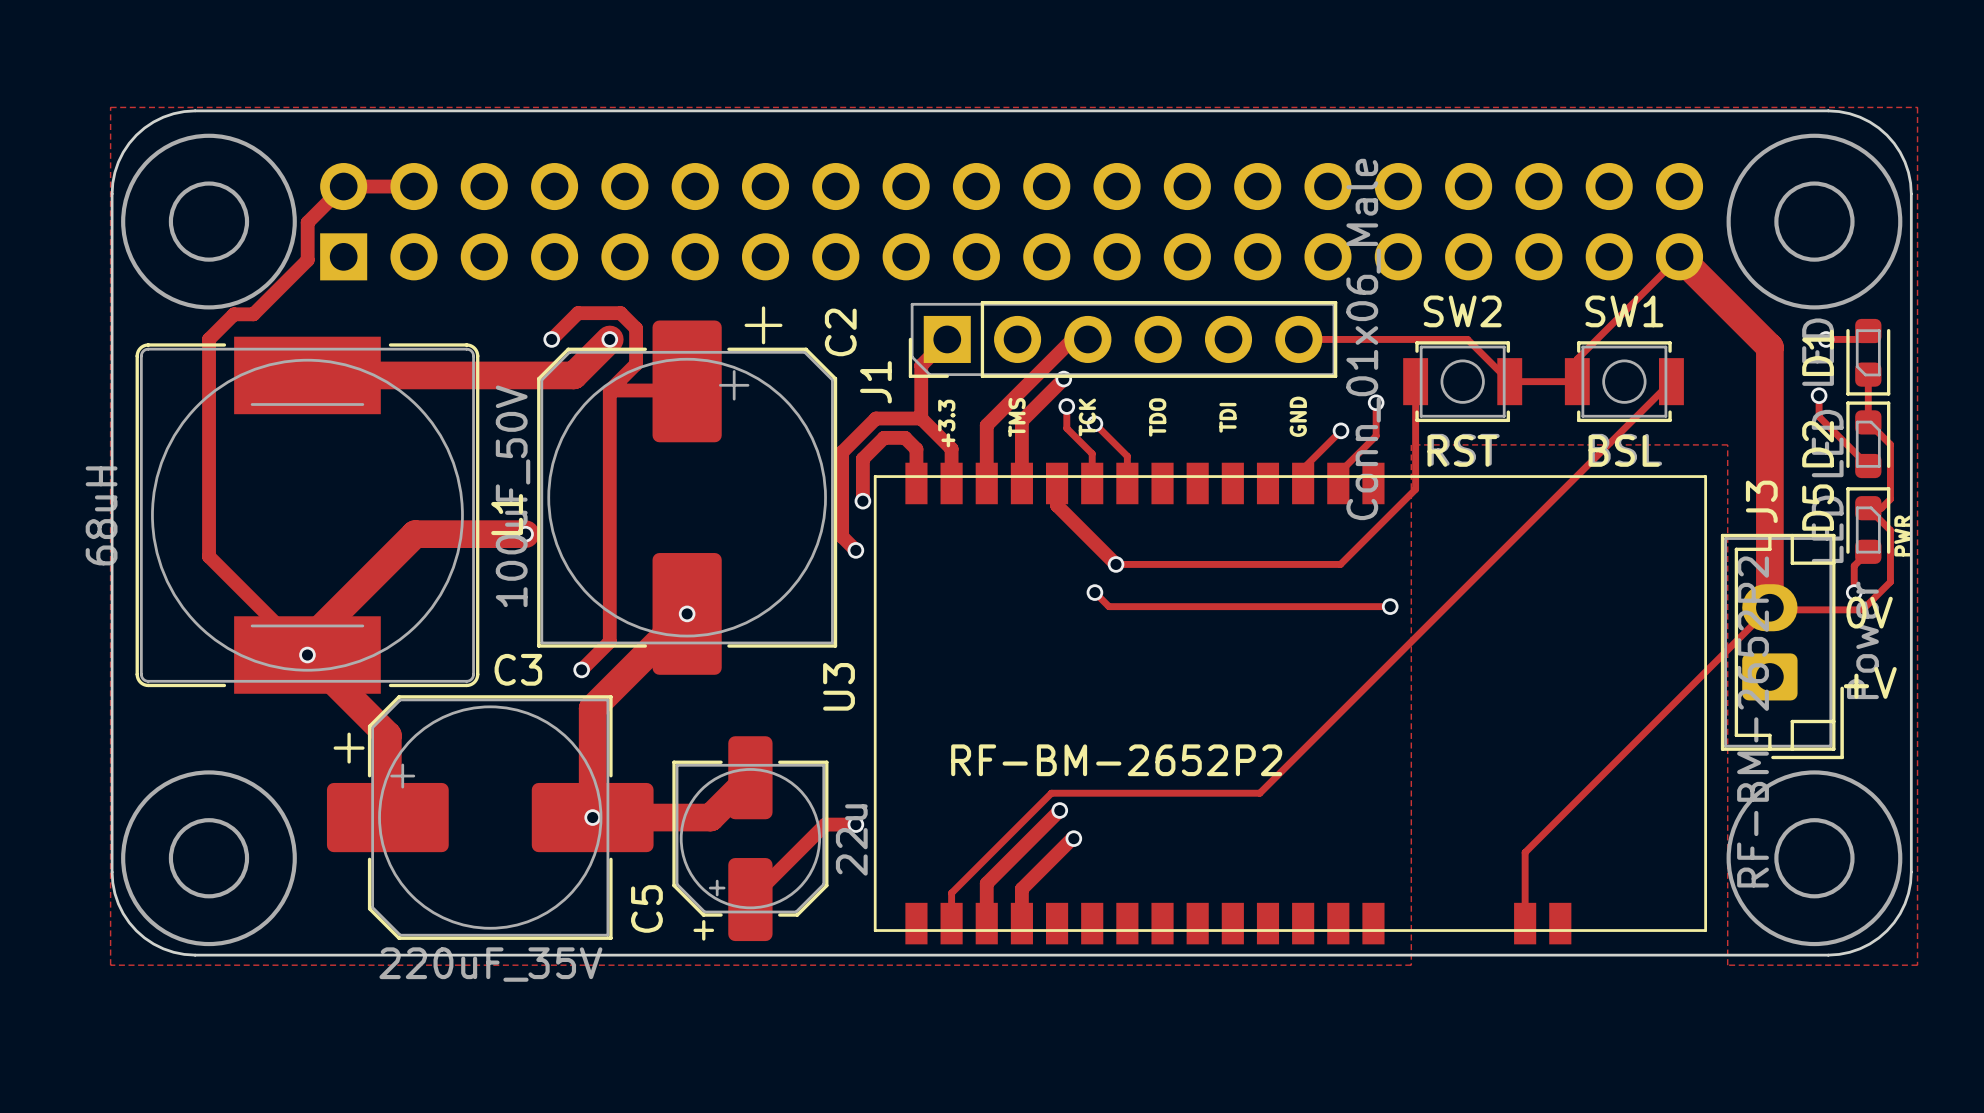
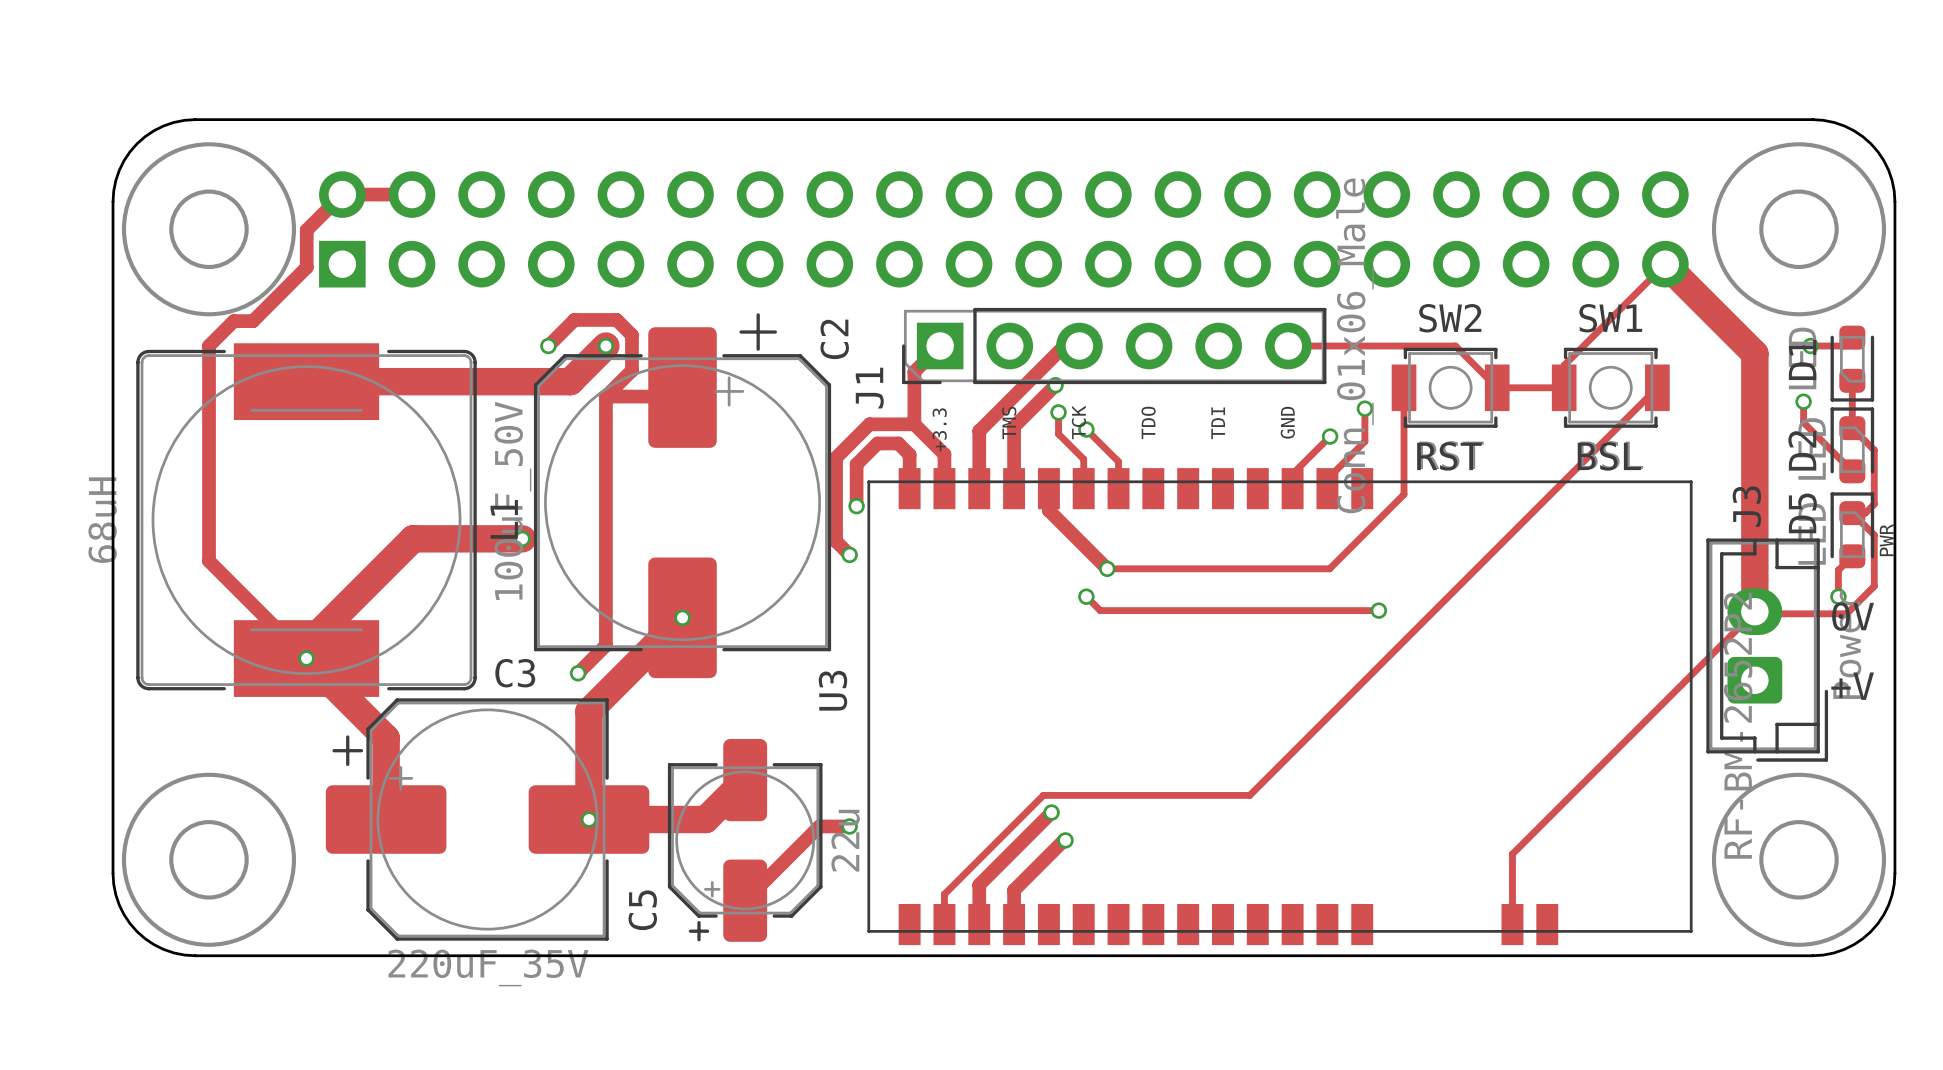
zone outline: (110, 107) (110, 965) (1411, 965) (1411, 444) (1727, 444) (1727, 965) (1917, 965) (1917, 107) (110, 107) -> none
text: RF-BM-2652P2 (1116, 760) -> none

